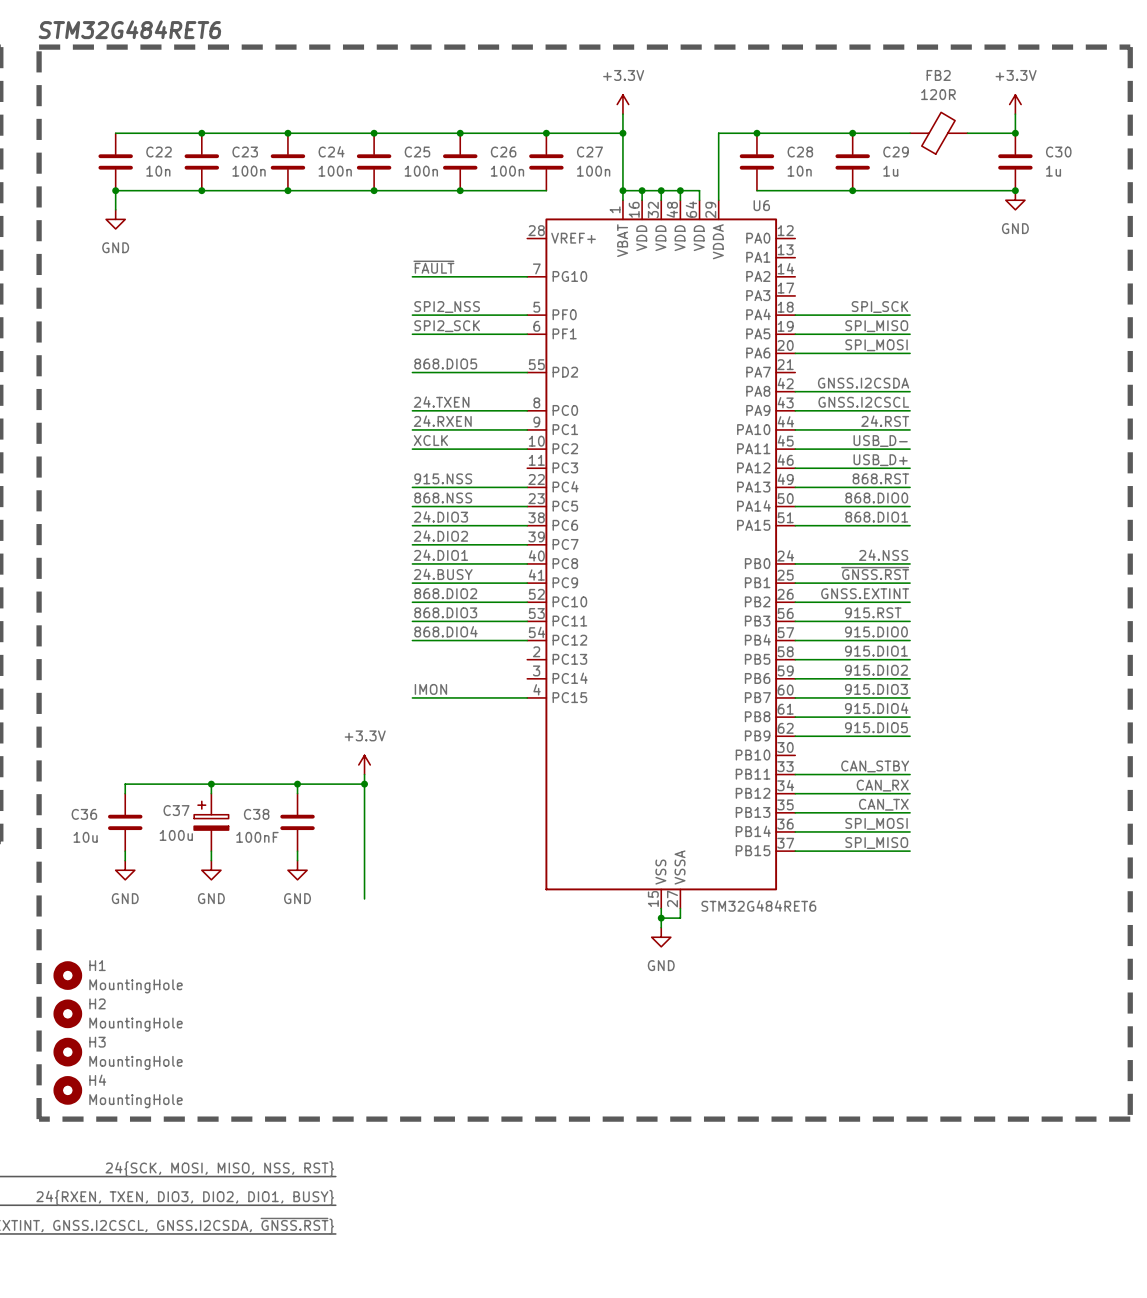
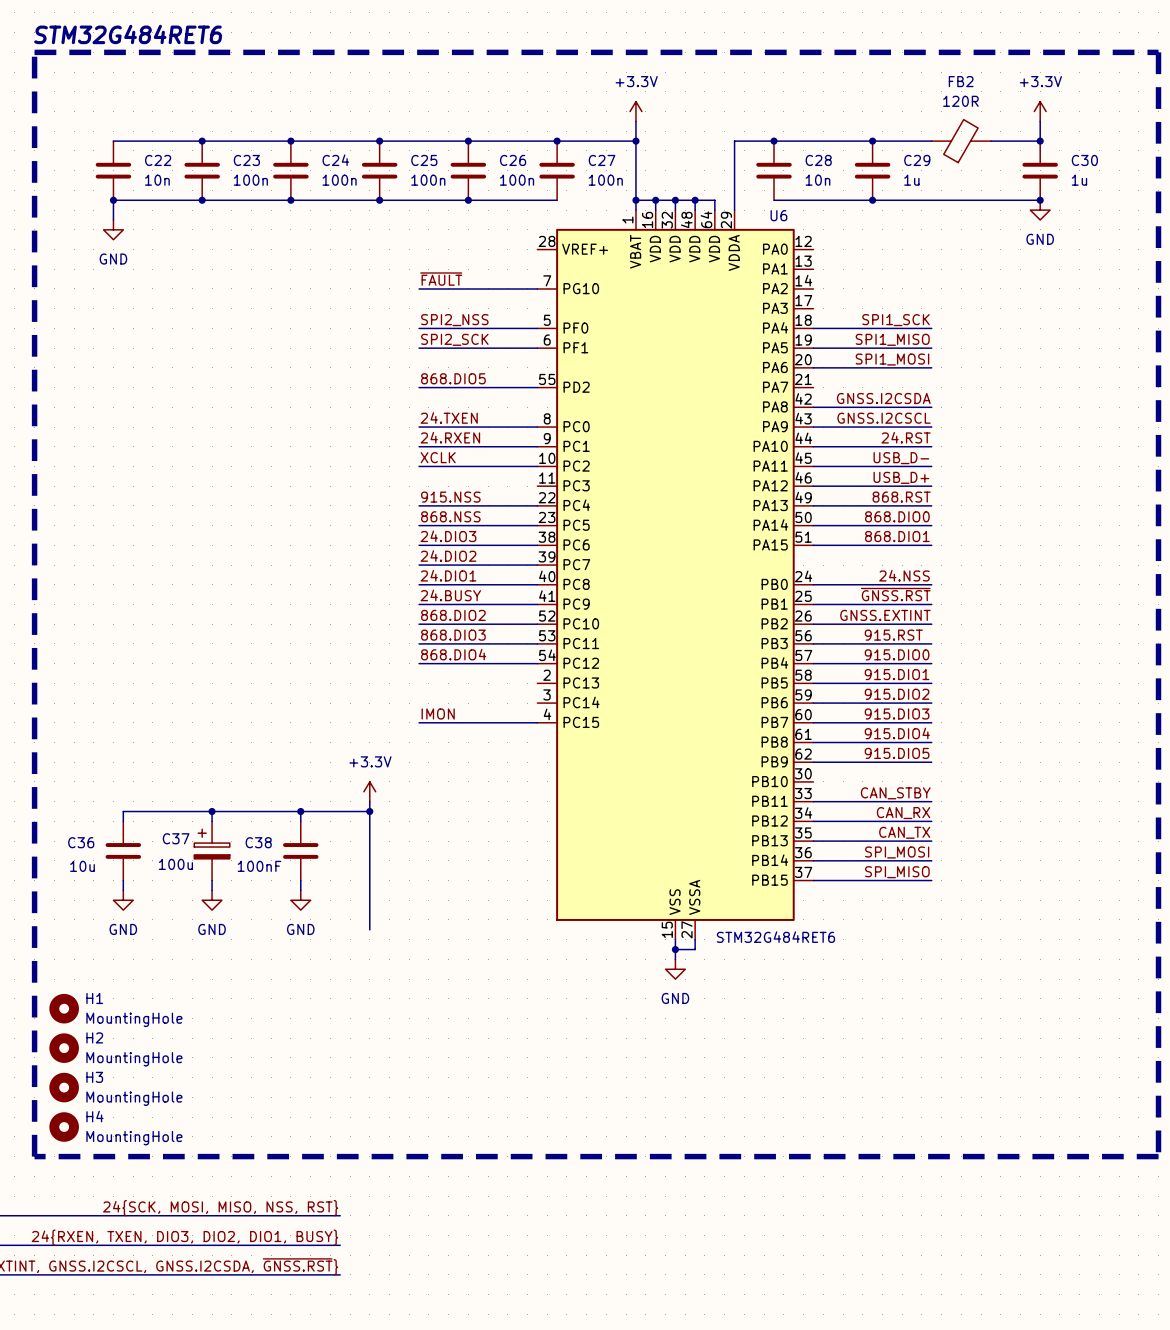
label: SPI_SCK (879, 307) -> SPI1_SCK (895, 320)
label: SPI_MISO (876, 326) -> SPI1_MISO (892, 339)
label: SPI_MOSI (876, 345) -> SPI1_MOSI (892, 359)

